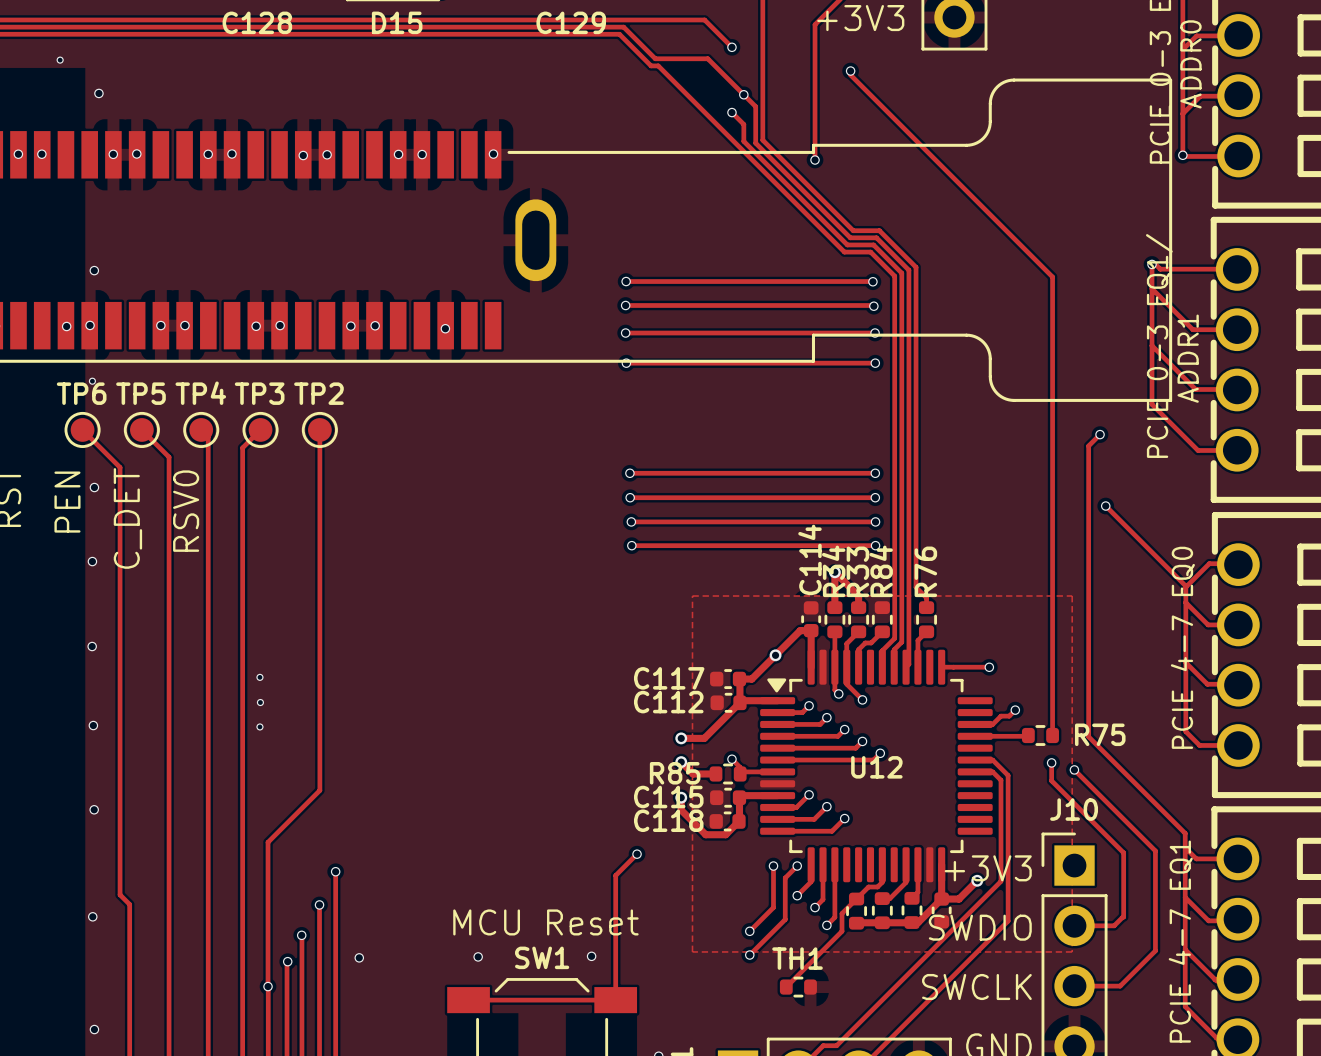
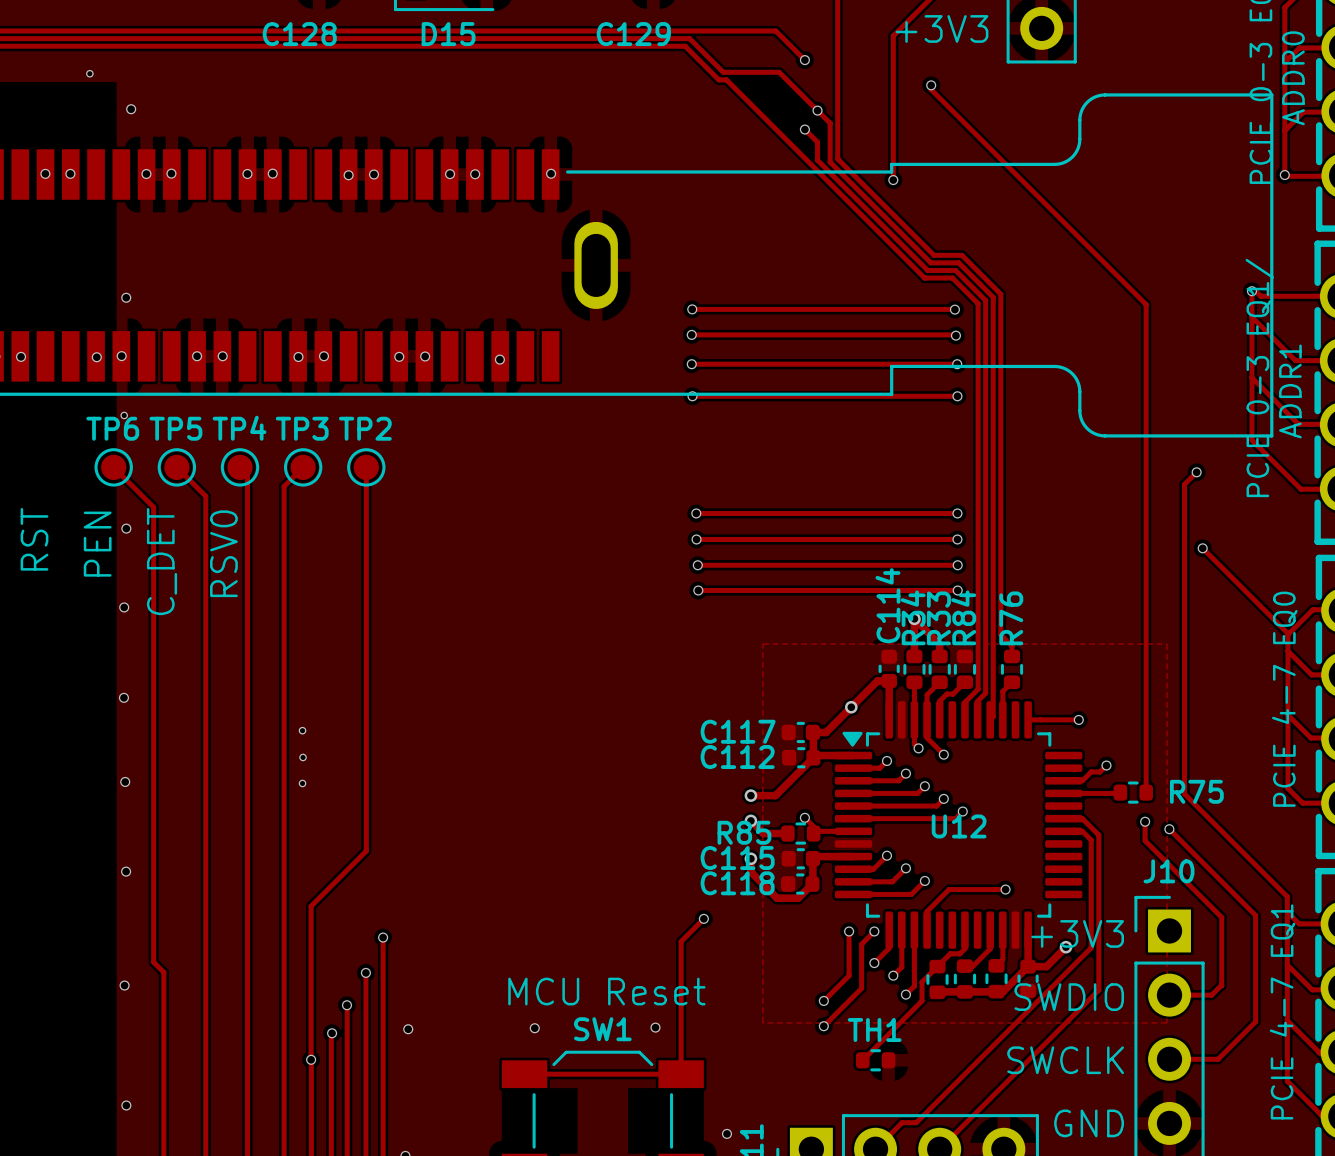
track: none -> (1005, 889) (949, 889) (927, 911) (927, 930)
via: none -> (1005, 889)

